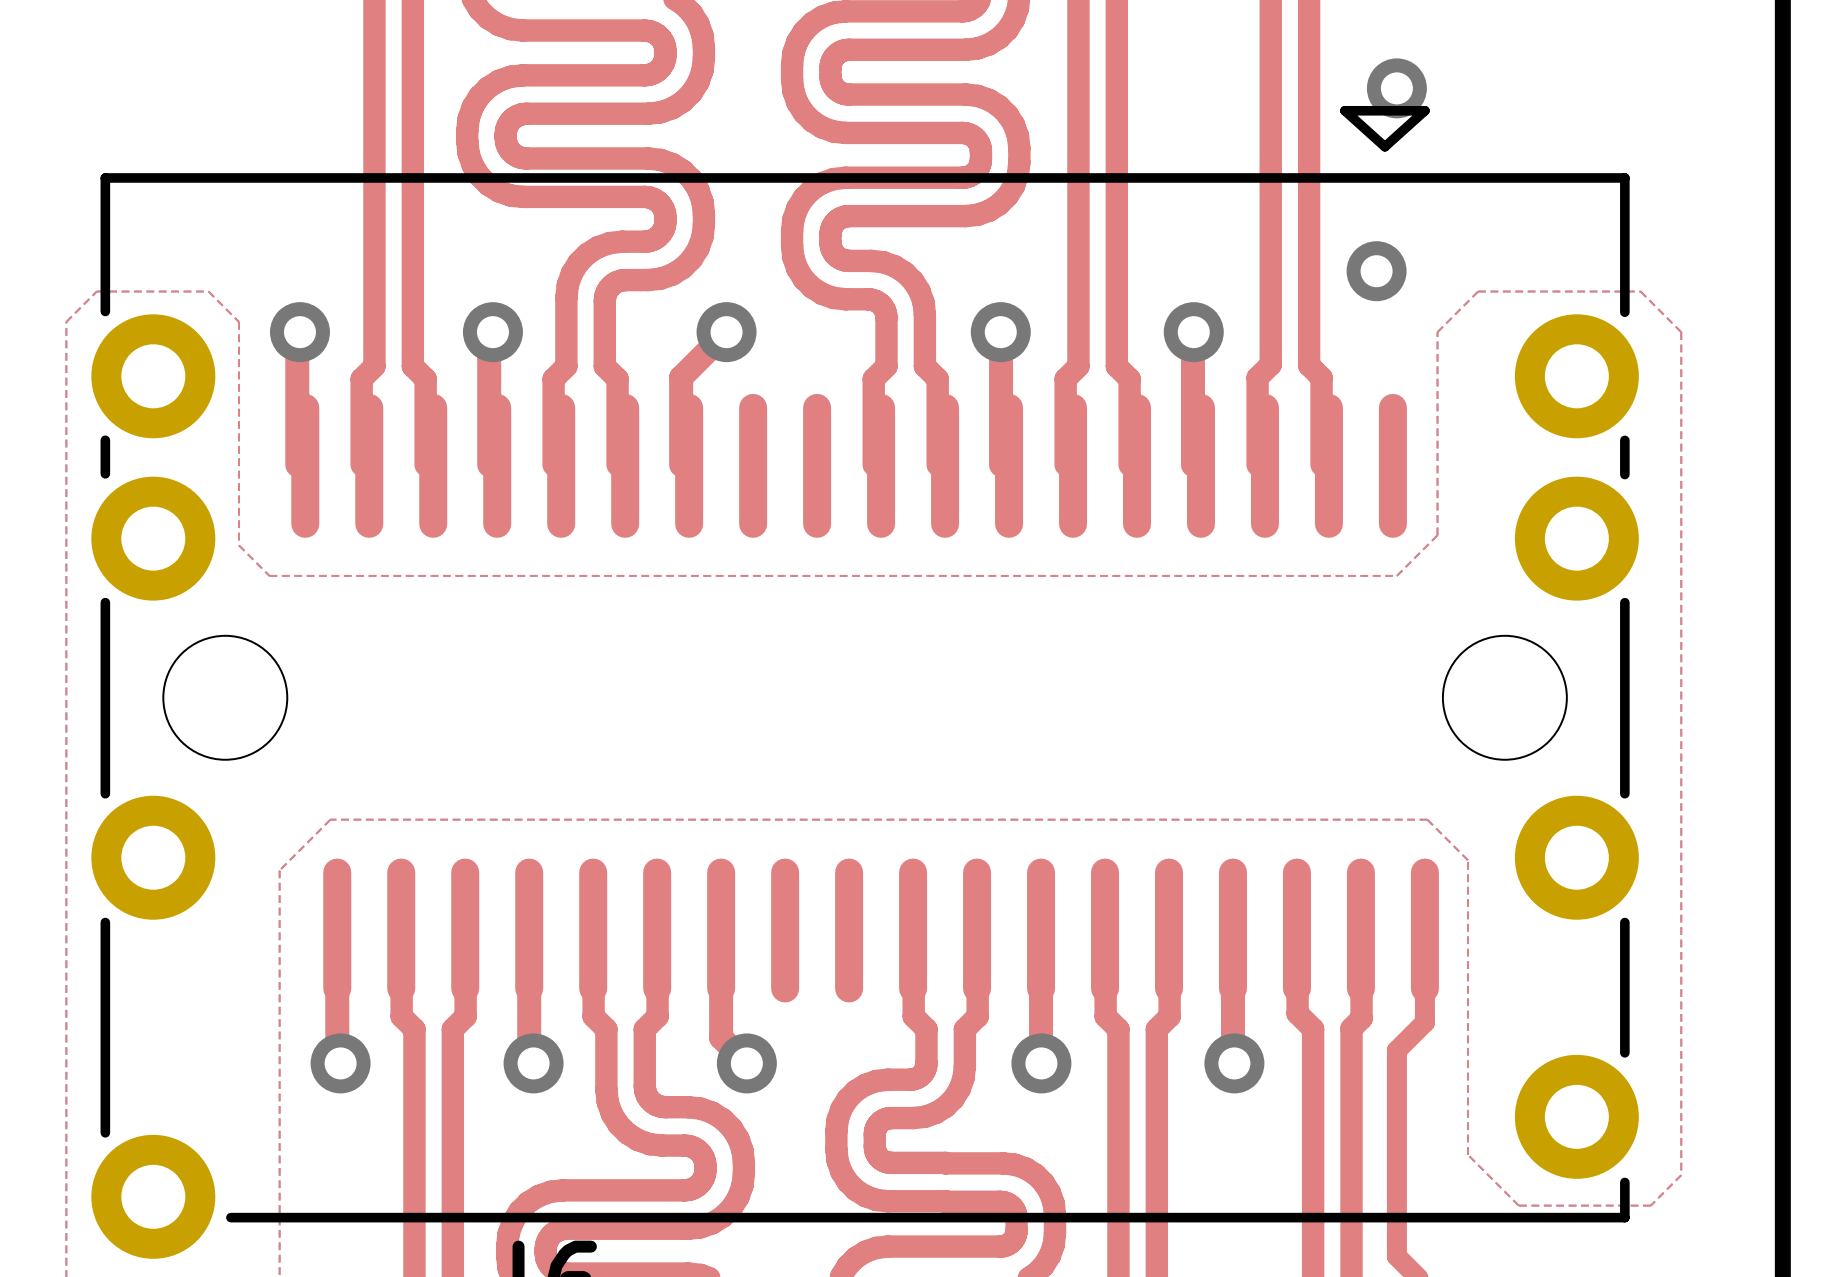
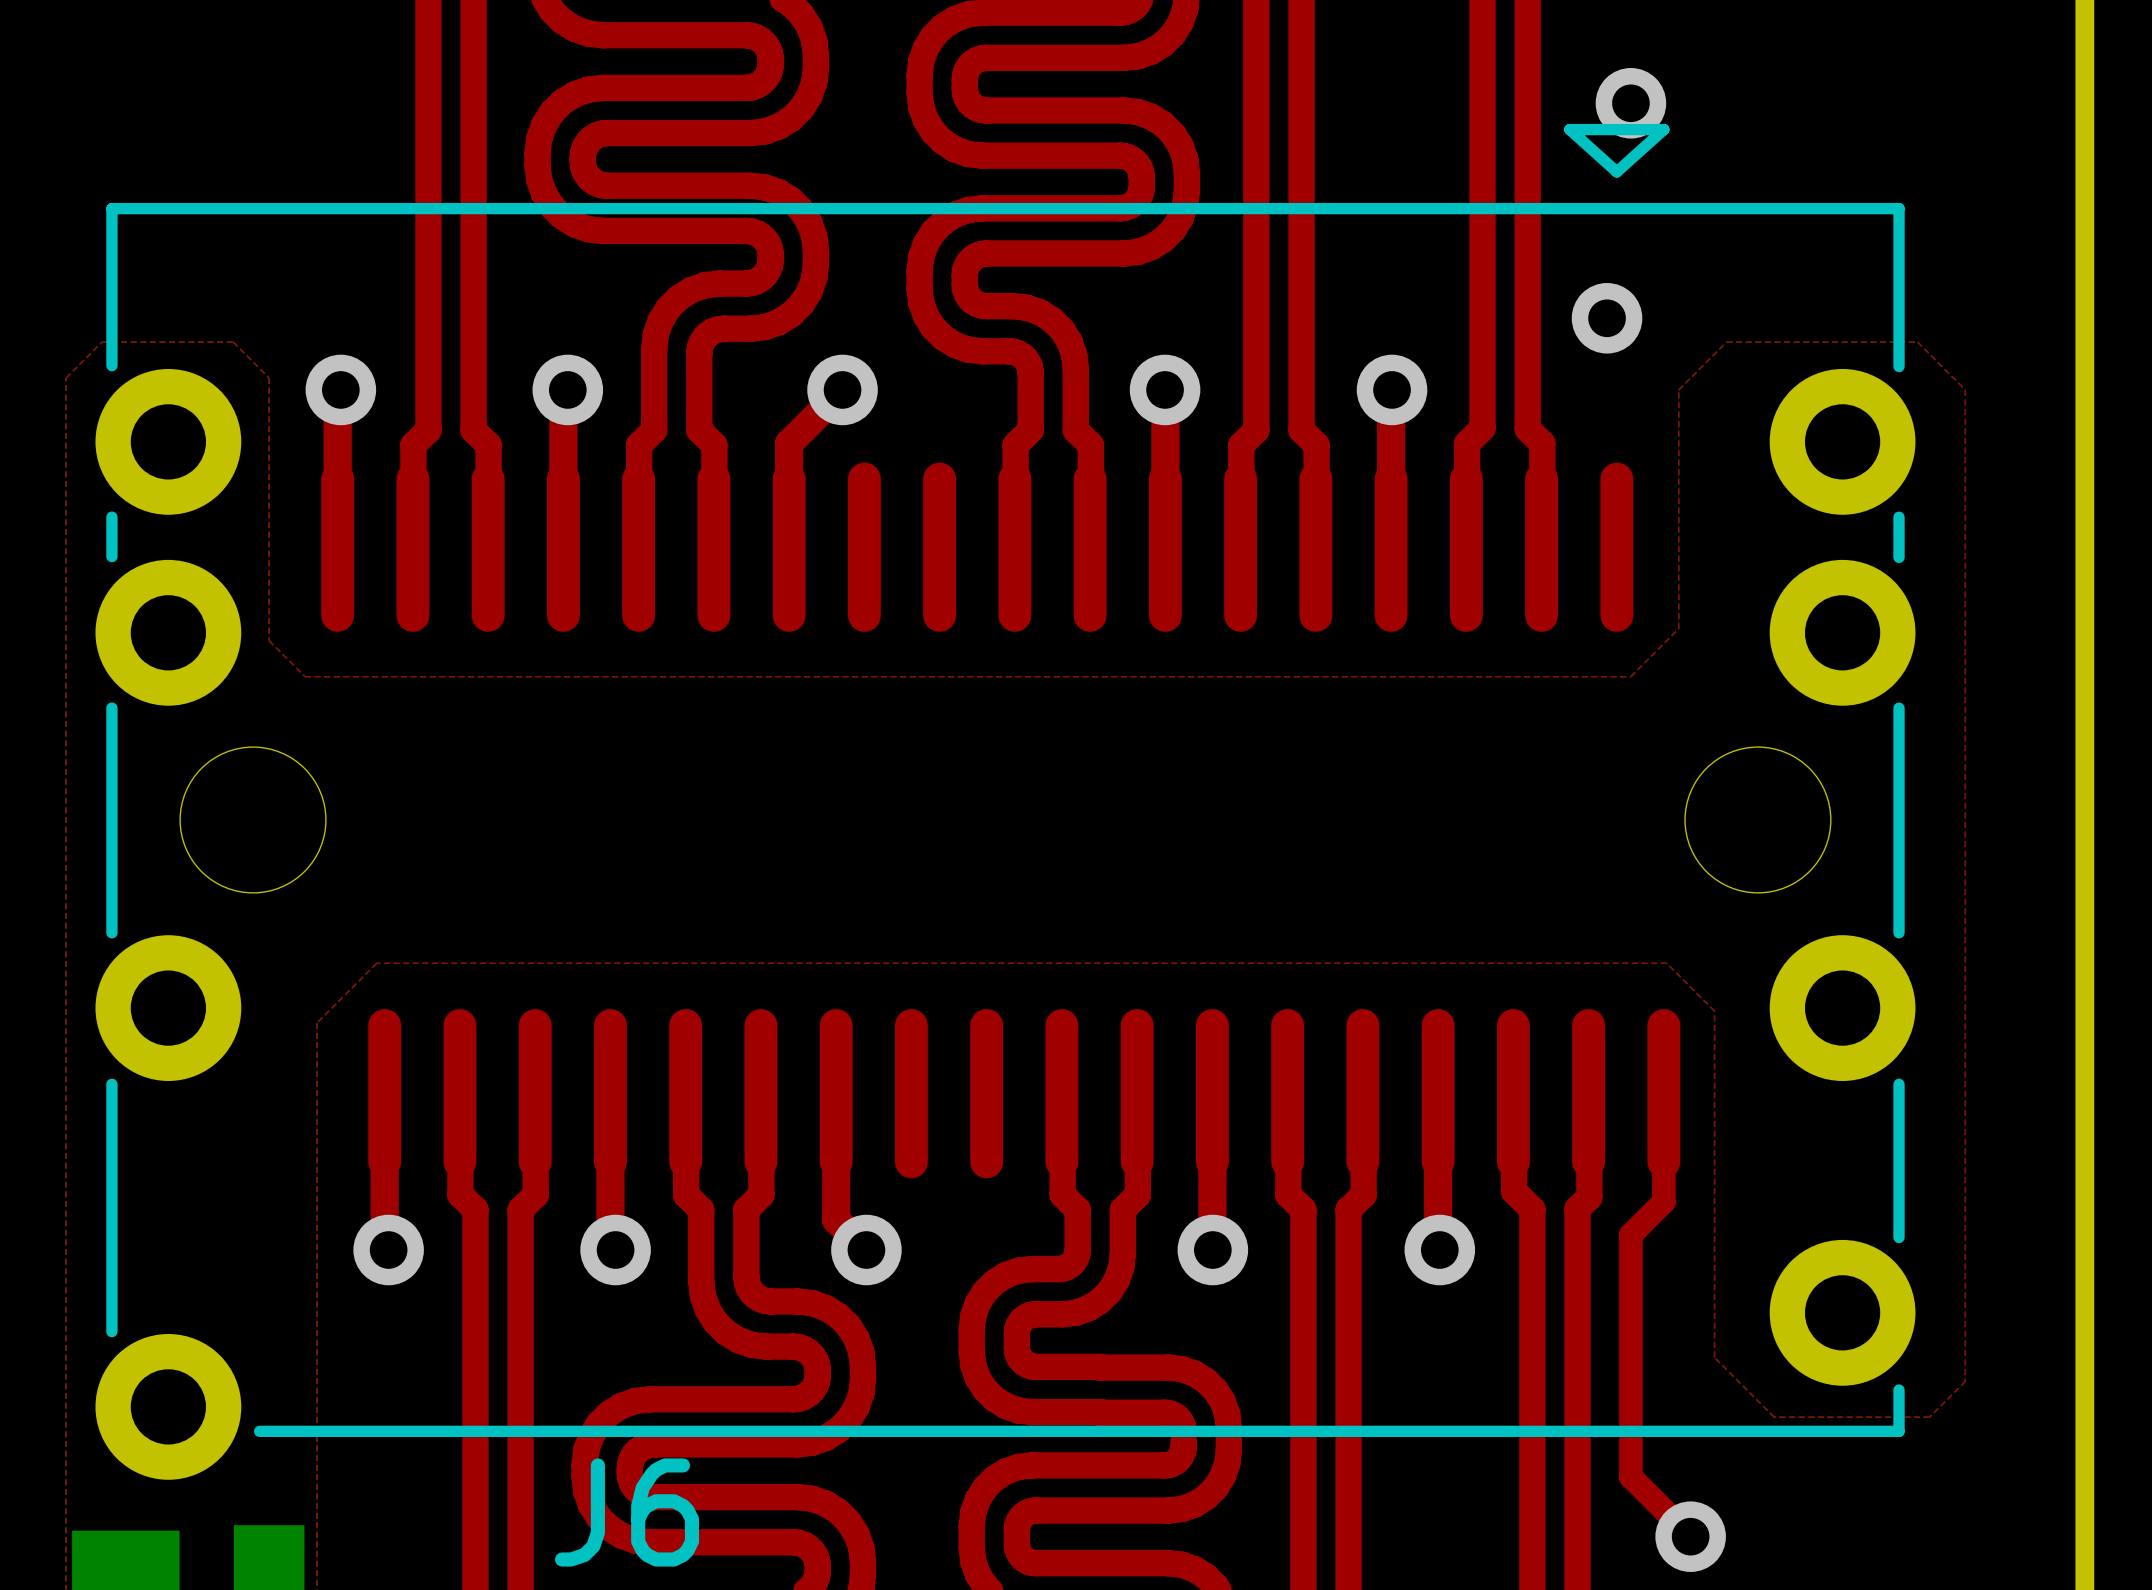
J6 footprint: [91, 105, 1639, 1259] -> [95, 123, 1916, 1480]

